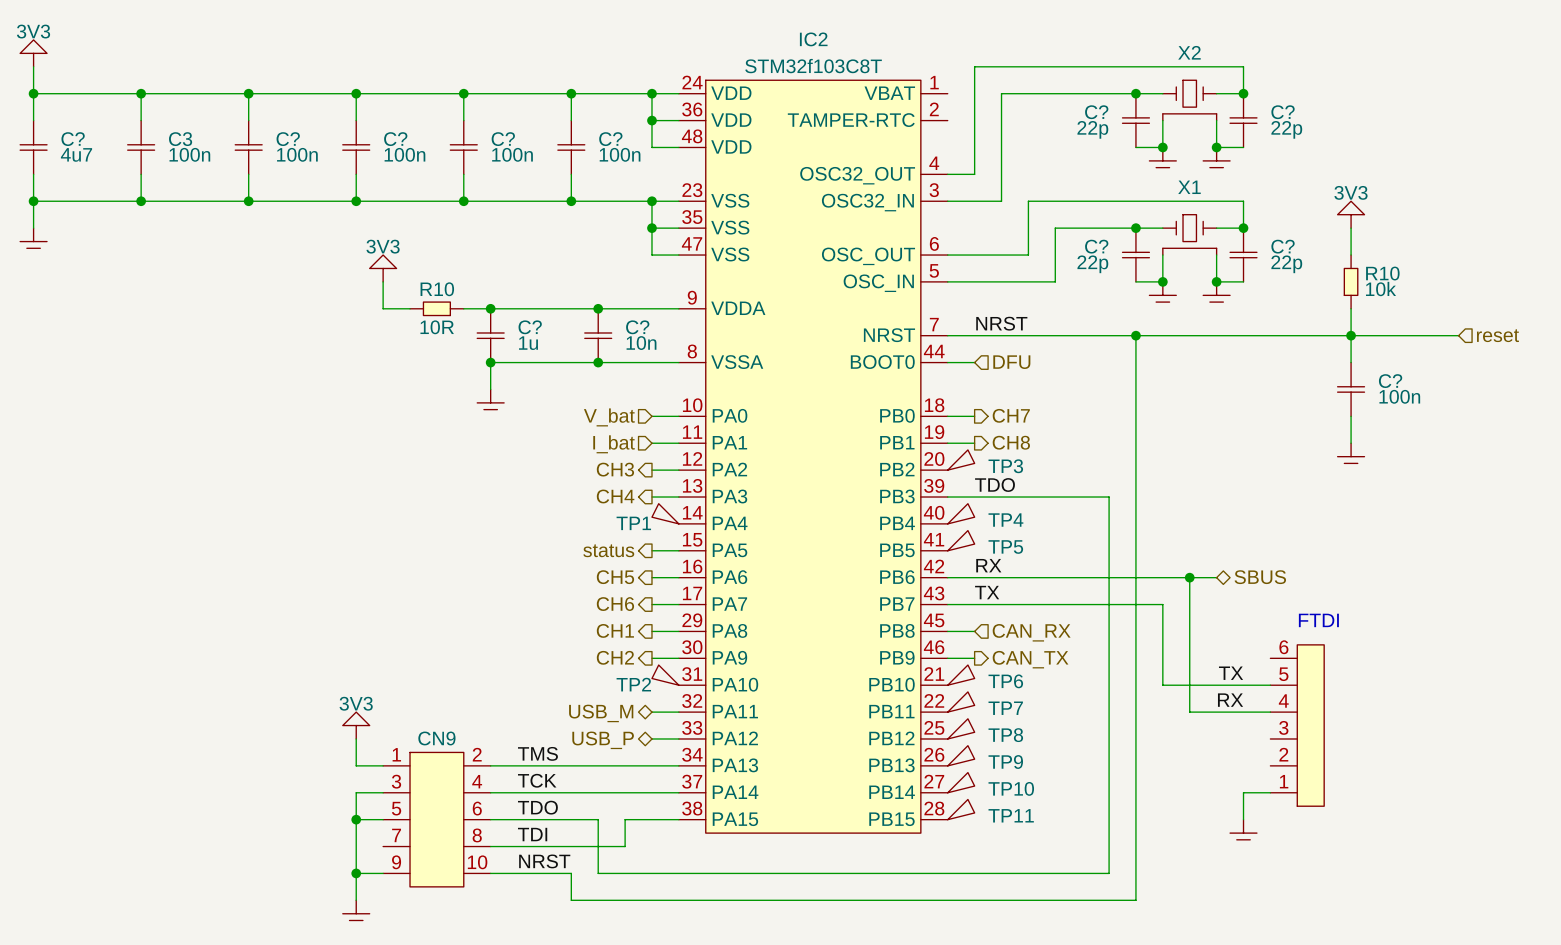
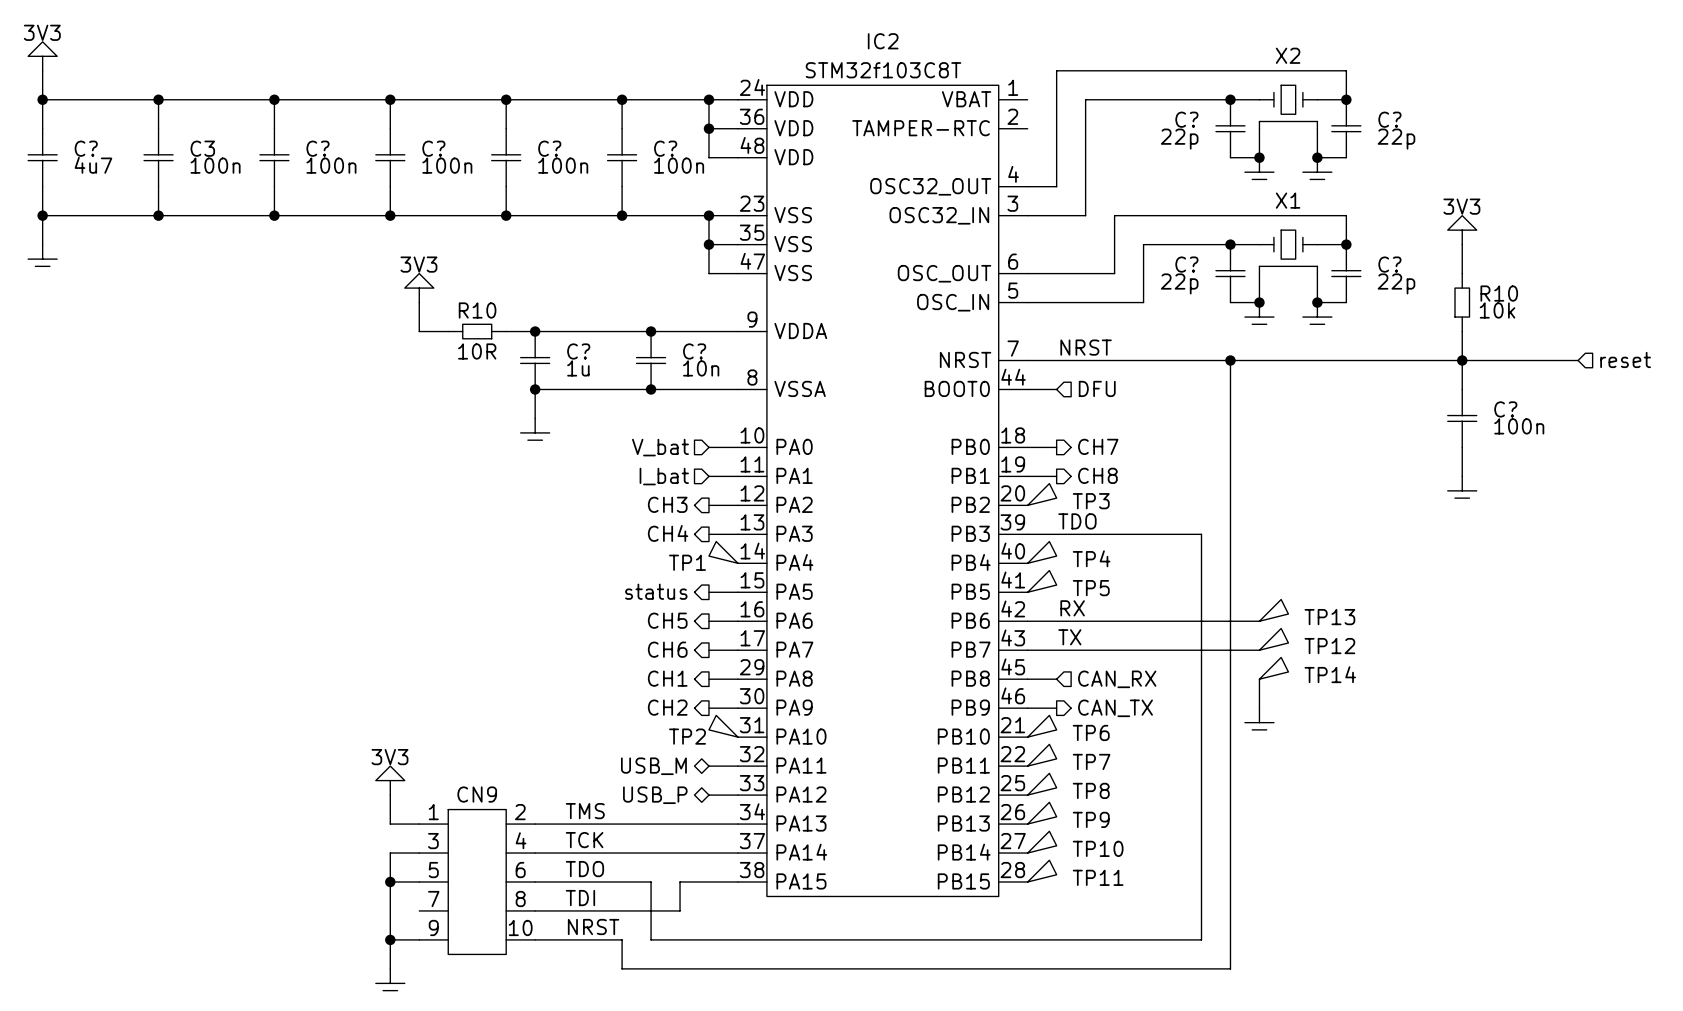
TP13: none -> (1273, 610)
wire: (1162, 577) (1216, 577) -> none
wire: (1189, 577) (1189, 712) (1270, 712) -> none
junction: (1189, 577) -> none
hierarchical label: SBUS (1260, 577) -> none
TP12: none -> (1273, 639)
wire: (1162, 604) (1162, 631) -> none
text: FTDI (1318, 620) -> none
TP14: none -> (1273, 668)
wire: (1162, 658) (1162, 685) (1270, 685) -> none
label: TX (1231, 673) -> none
label: RX (1230, 700) -> none
part: (1297, 725) -> none
wire: (1270, 792) (1243, 792) (1243, 819) -> none
power symbol position: (1243, 833) -> (1259, 722)

